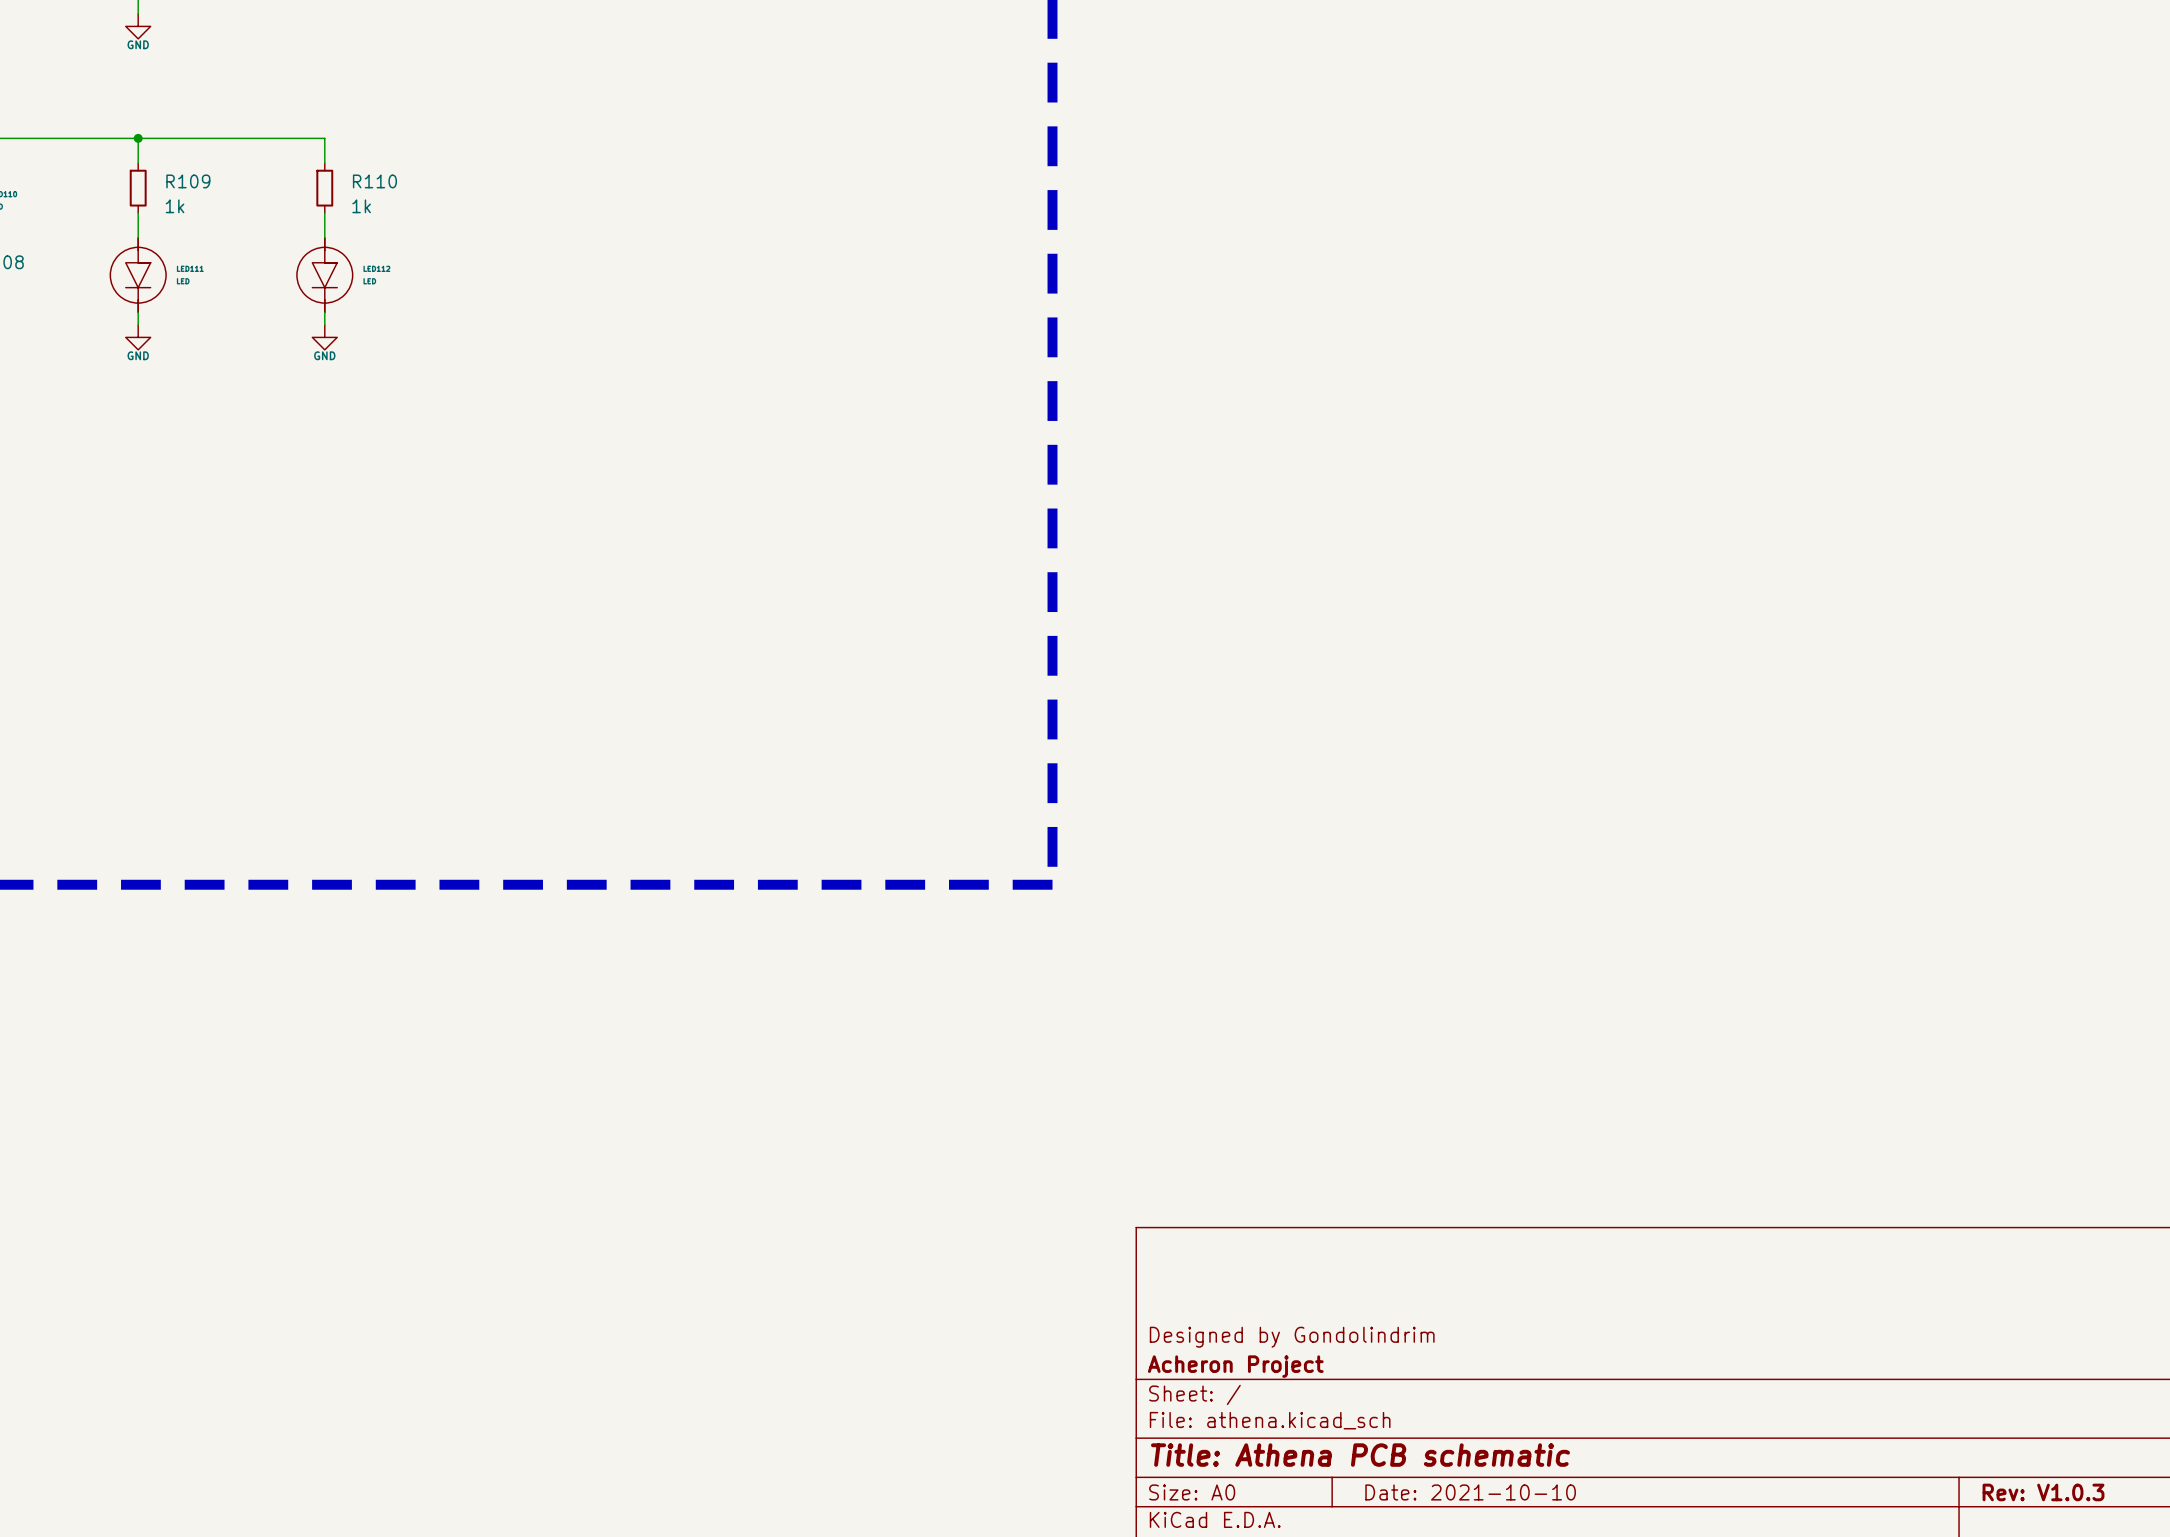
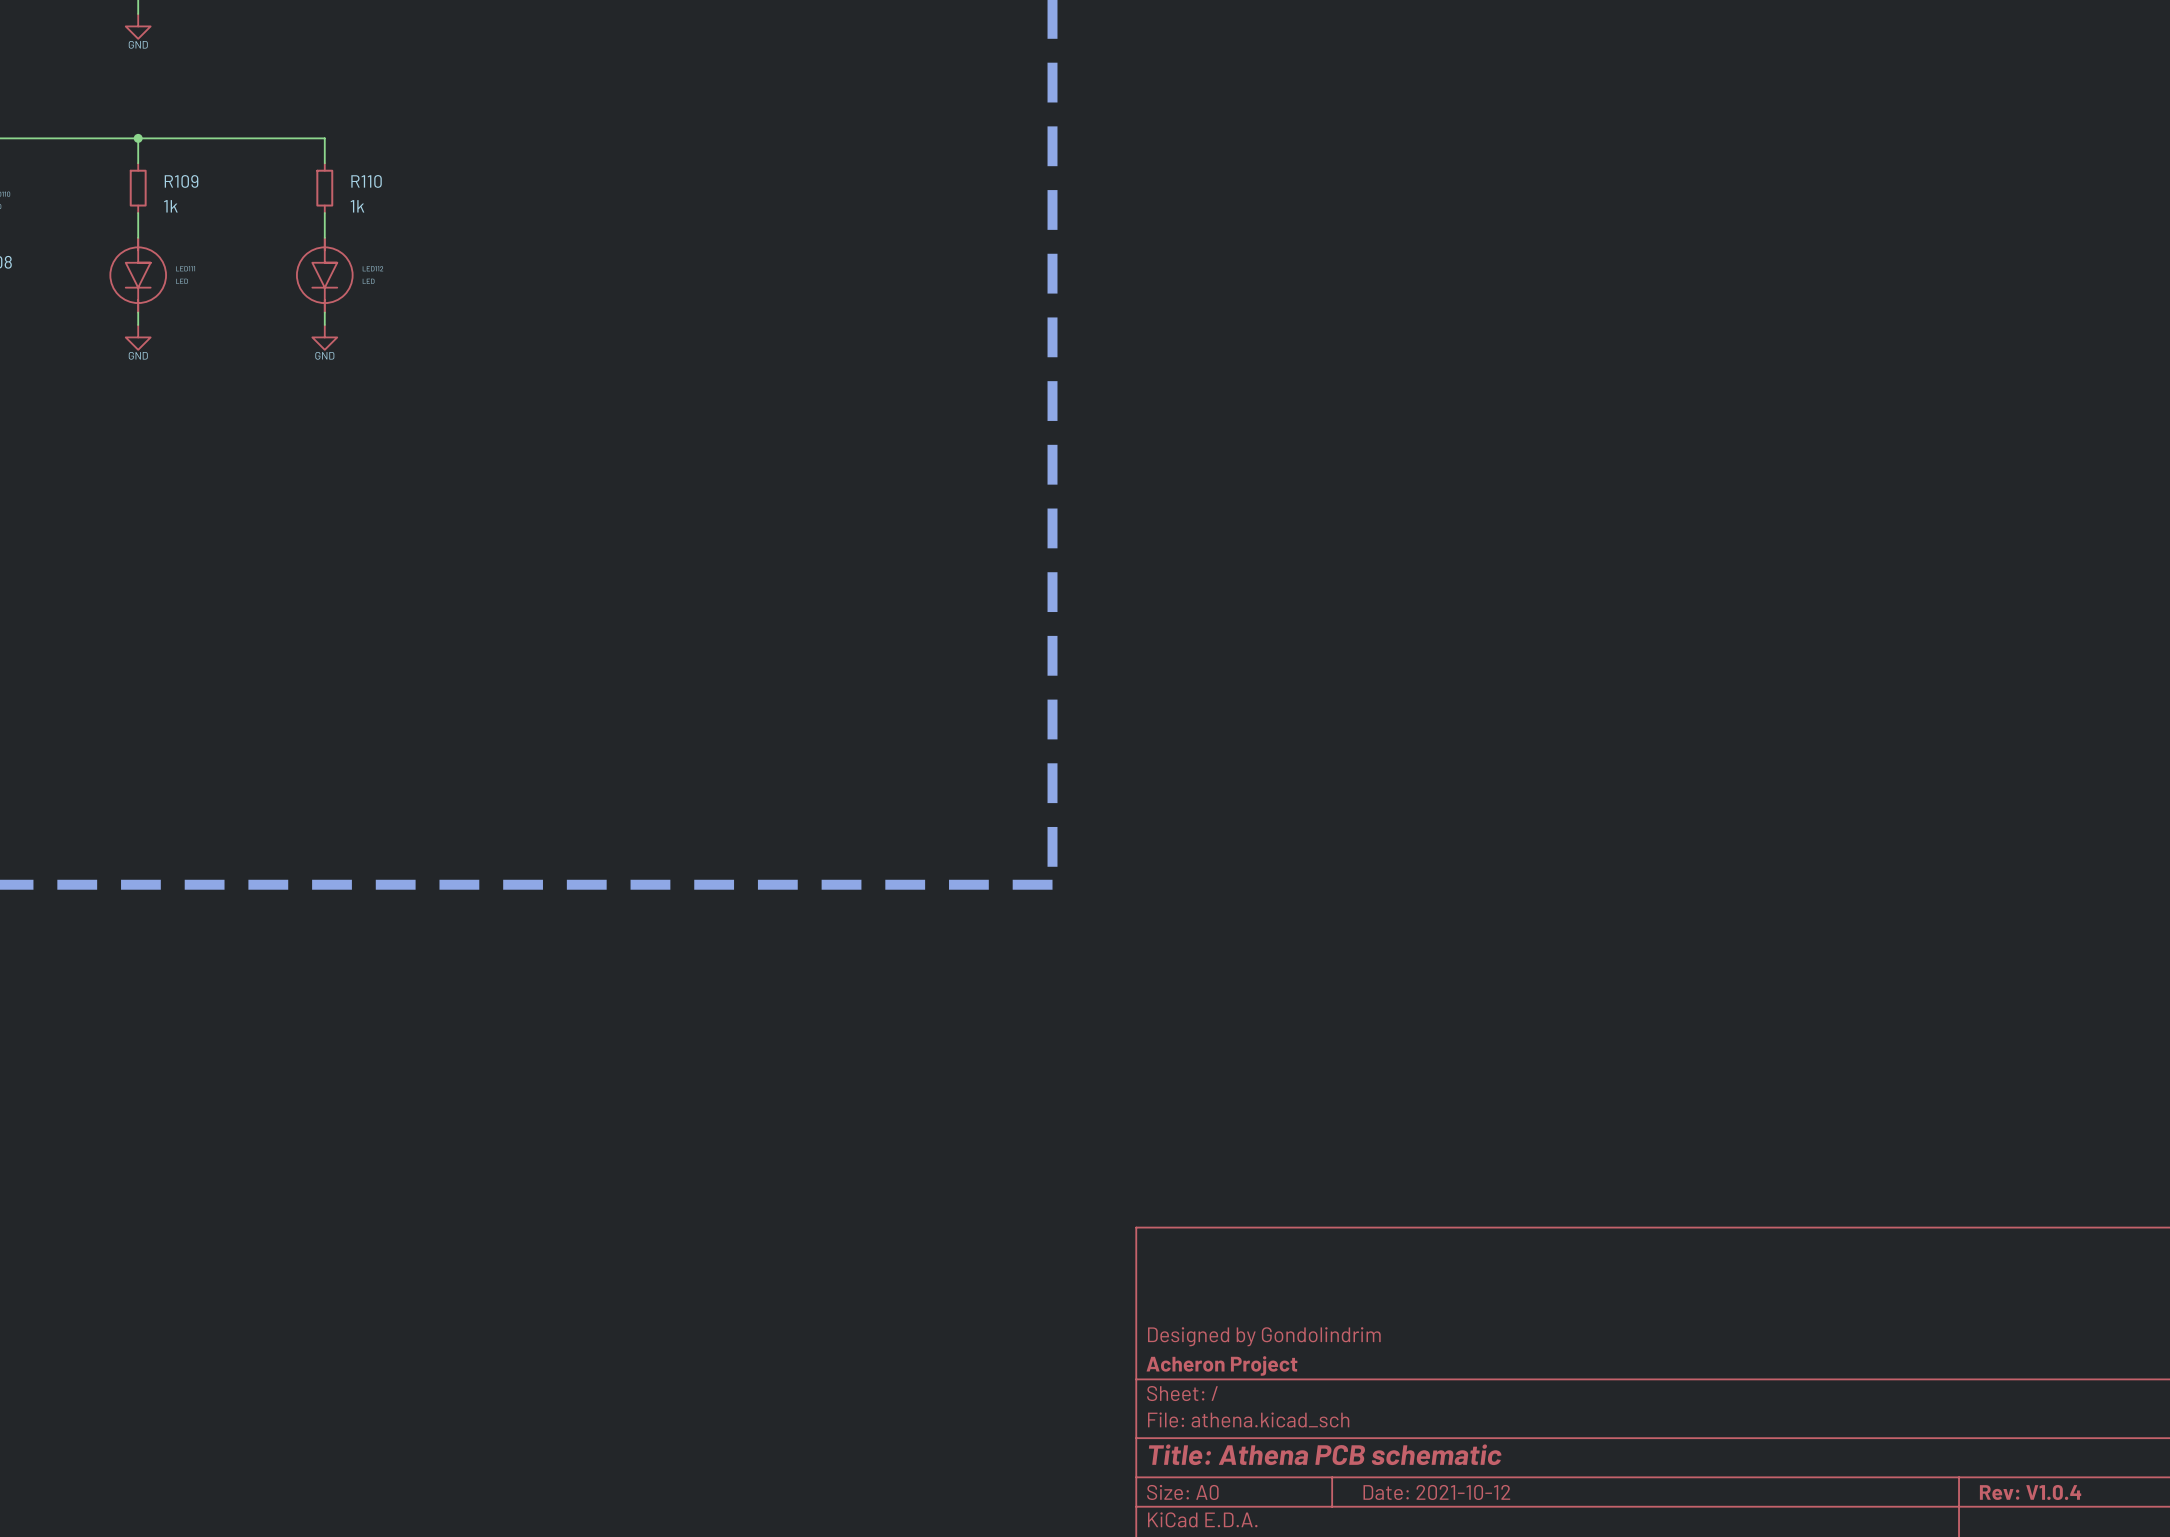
title block: Date: 2021-10-10 (1470, 1492) -> Date: 2021-10-12 (1436, 1492)
title block: Rev: V1.0.3 (2043, 1492) -> Rev: V1.0.4 (2030, 1492)

